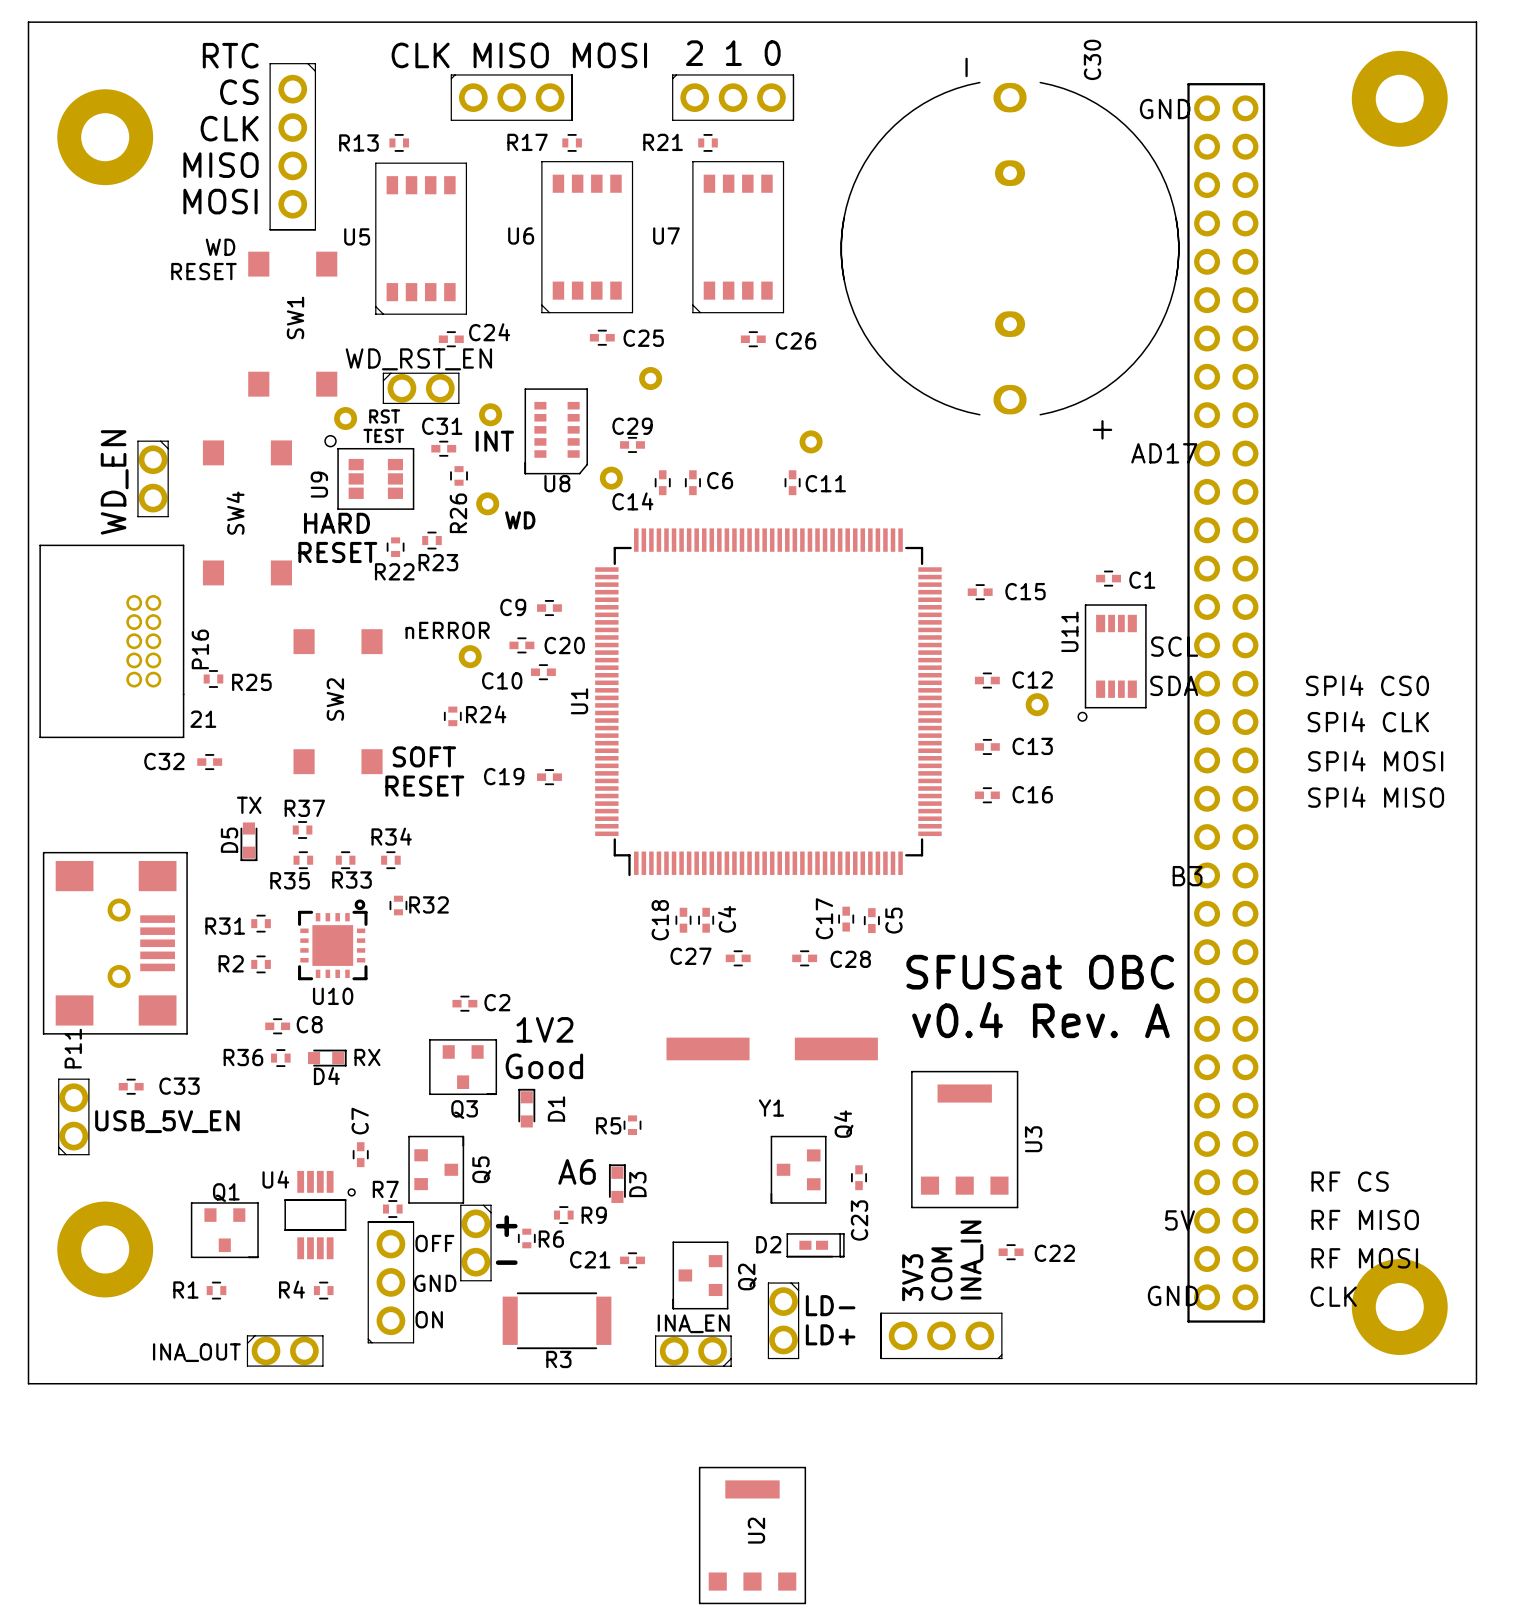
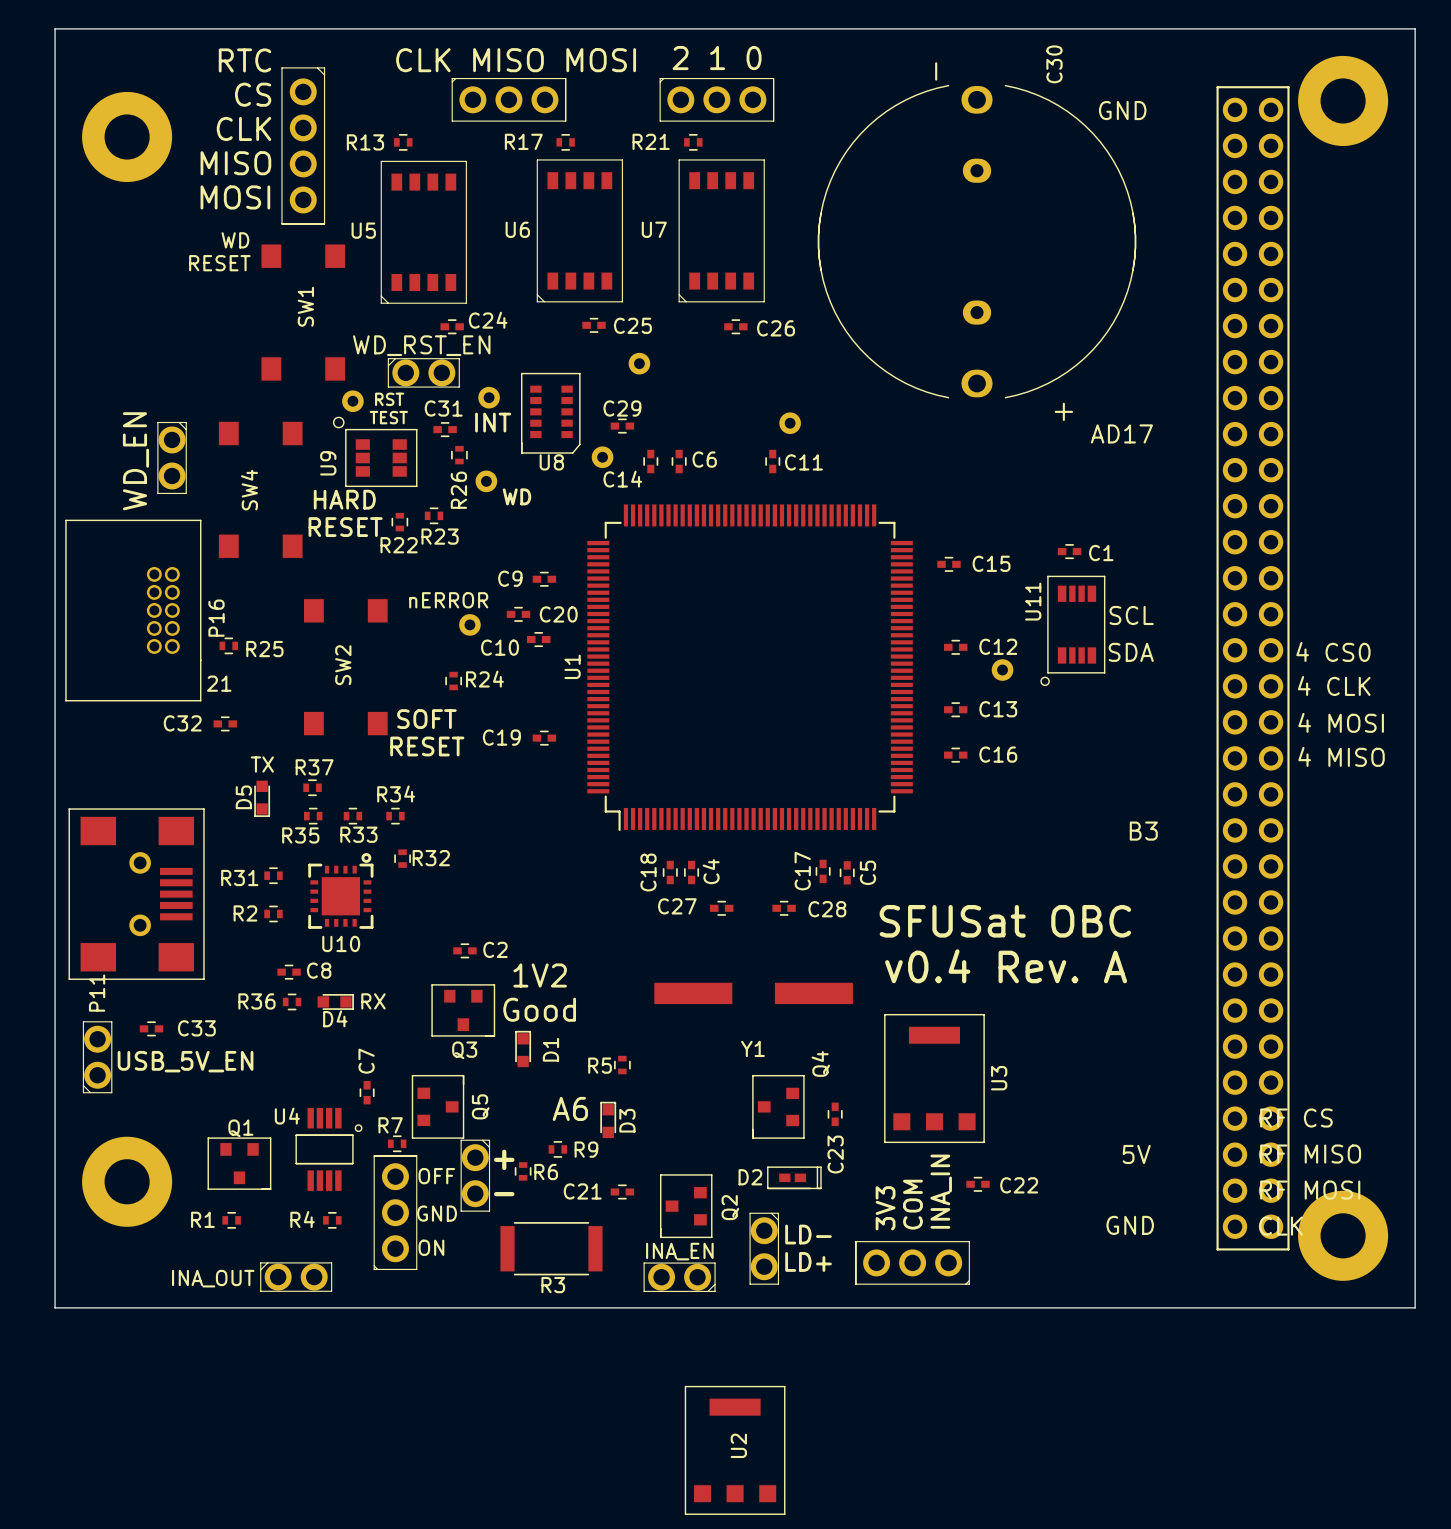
text: SPI4 CS0 (1367, 685) -> 4 CS0 (1333, 651)
part position: (1226, 702) -> (1253, 668)
text: SPI4 CLK (1368, 721) -> 4 CLK (1334, 686)
text: SPI4 MOSI (1375, 760) -> 4 MOSI (1341, 722)
text: SPI4 MISO (1376, 797) -> 4 MISO (1341, 756)

